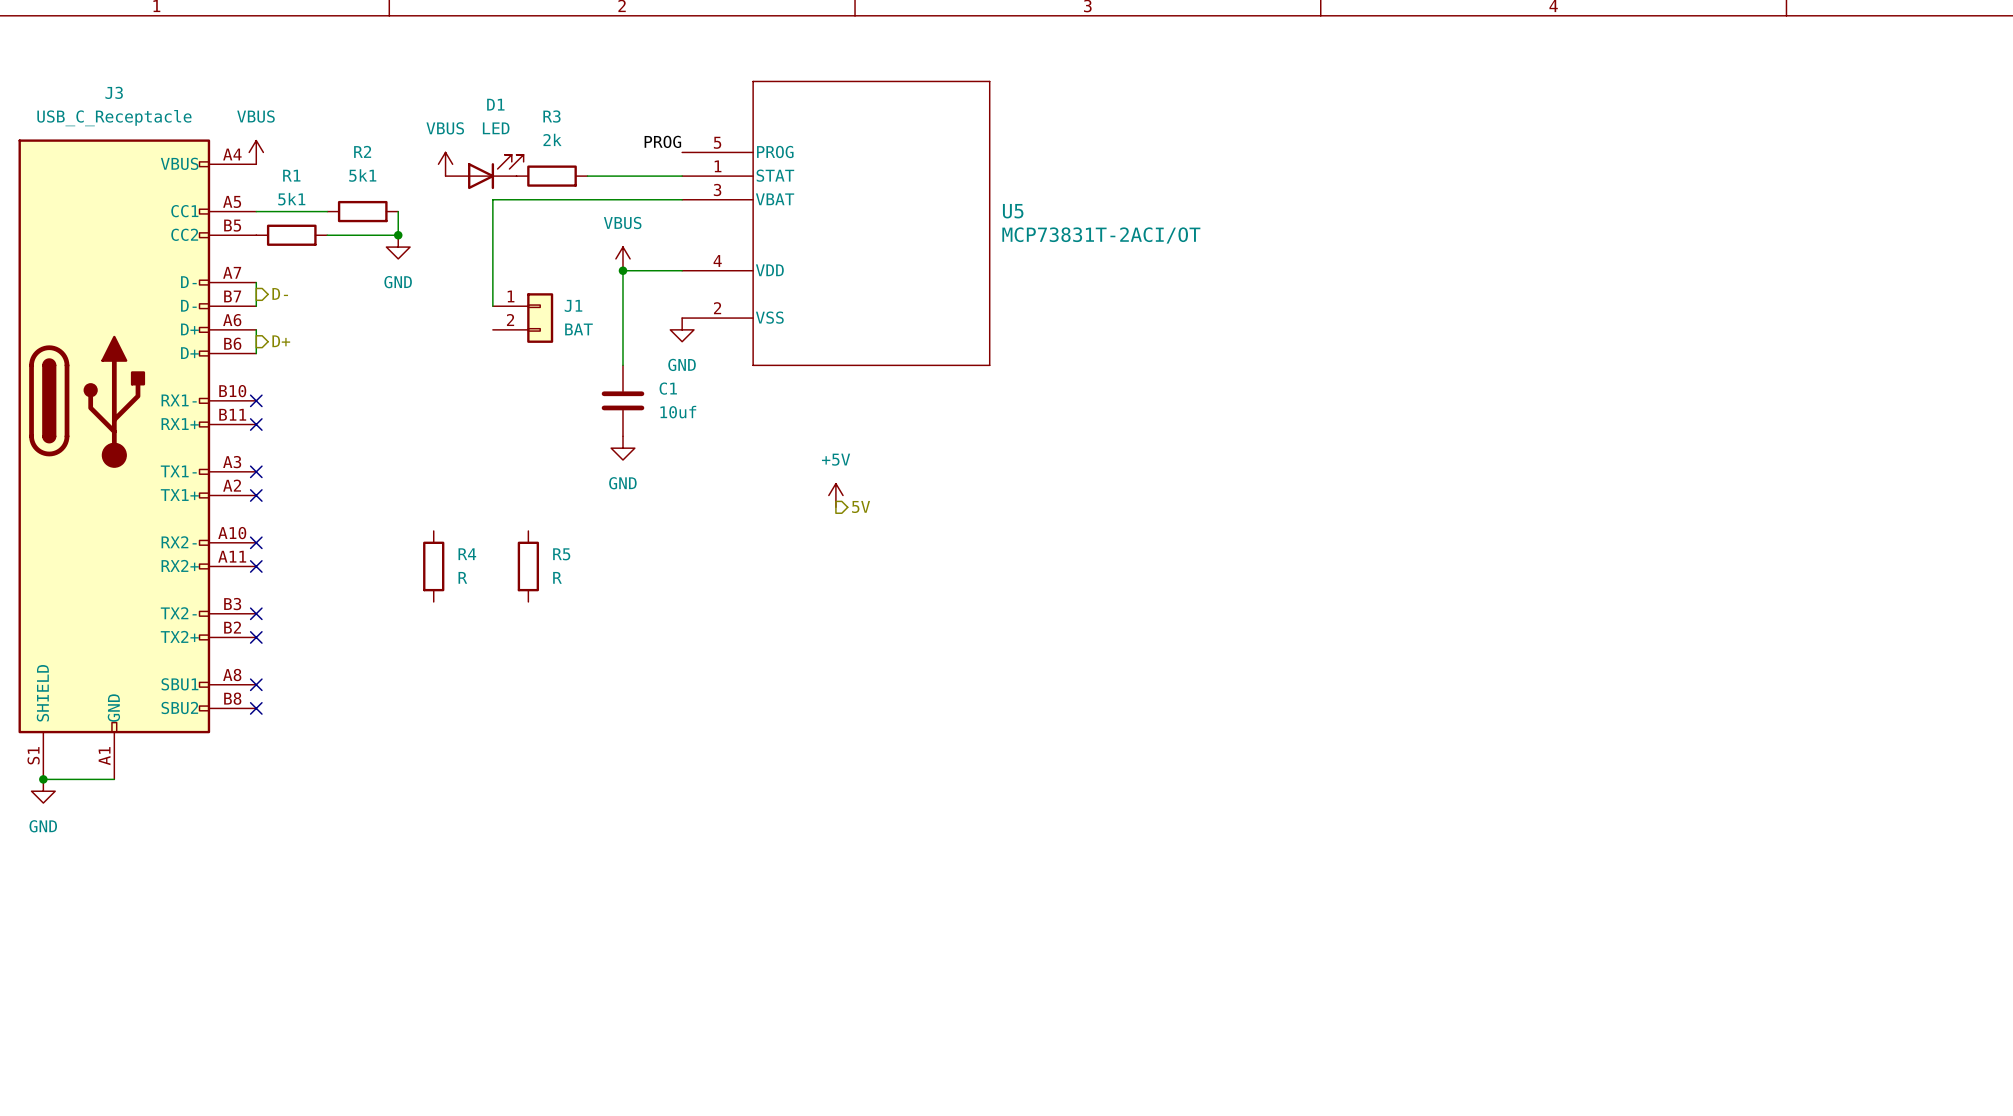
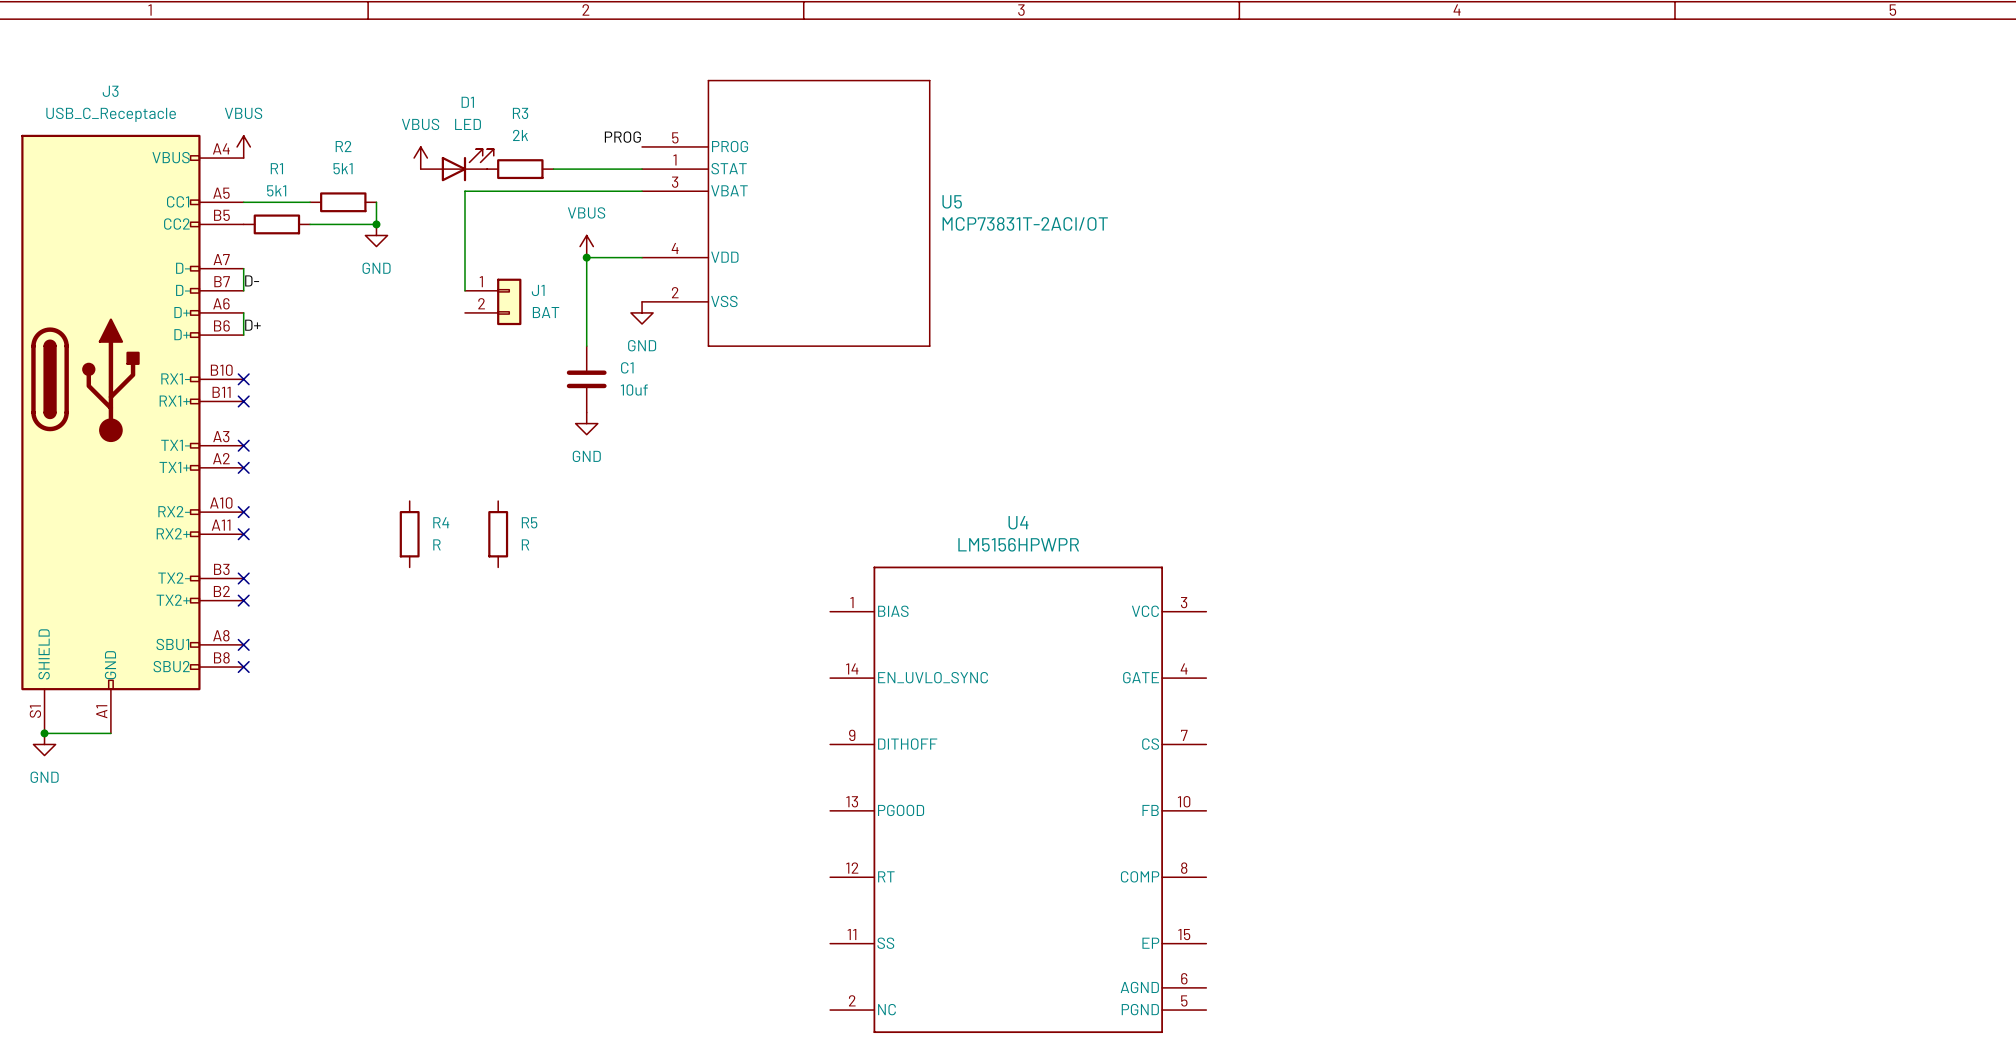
hierarchical label: D- (280, 293) -> none
label: none -> D- (252, 280)
hierarchical label: D+ (281, 341) -> none
label: none -> D+ (252, 325)
power symbol: +5V (835, 495) -> none
hierarchical label: 5V (861, 506) -> none
U4: none -> LM5156HPWPR (1018, 799)

